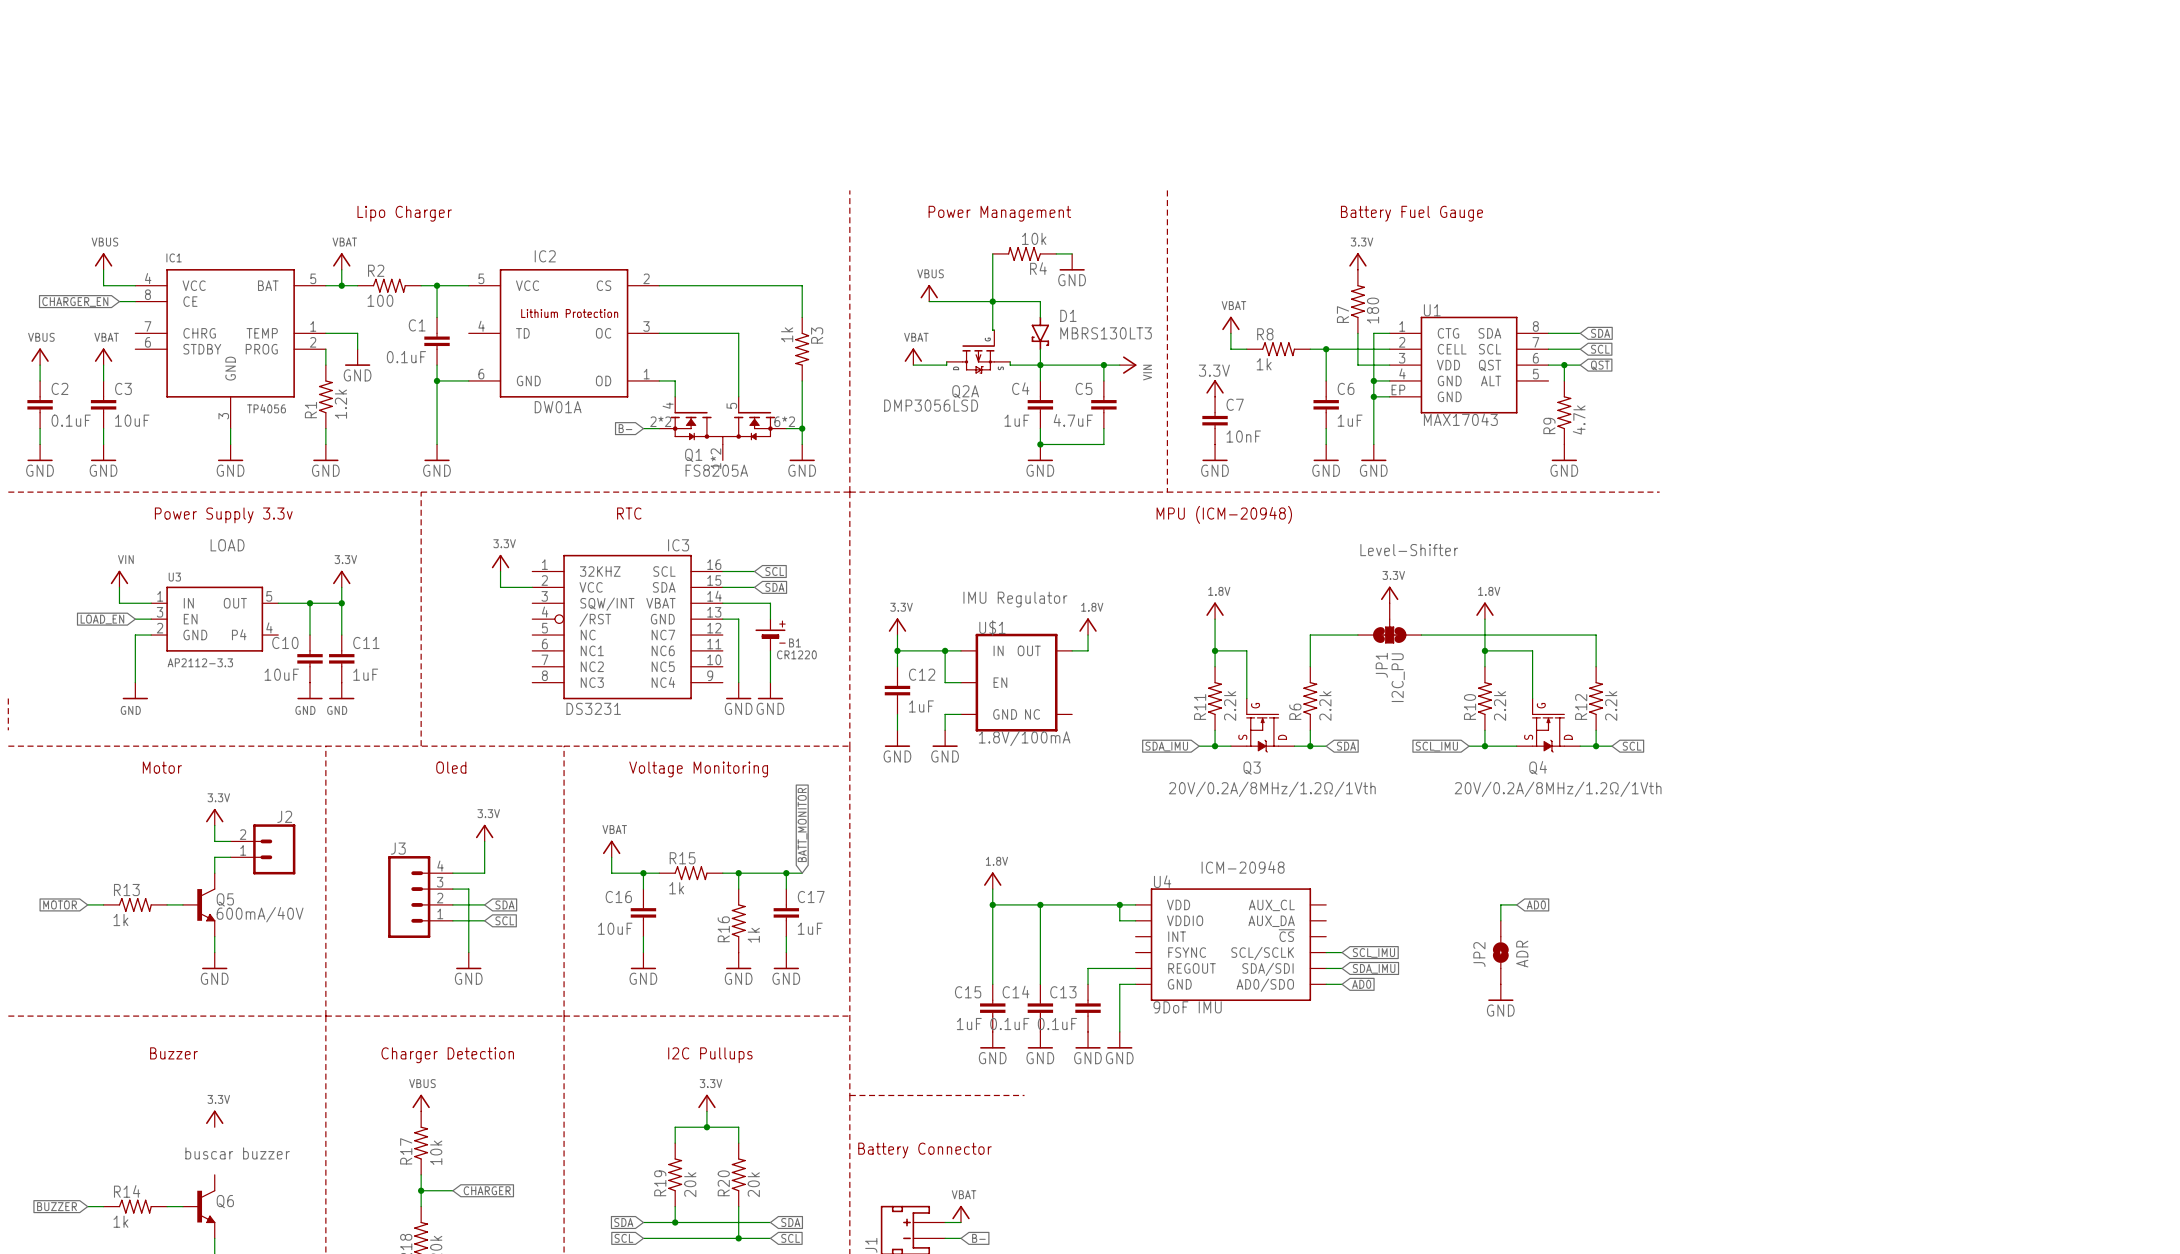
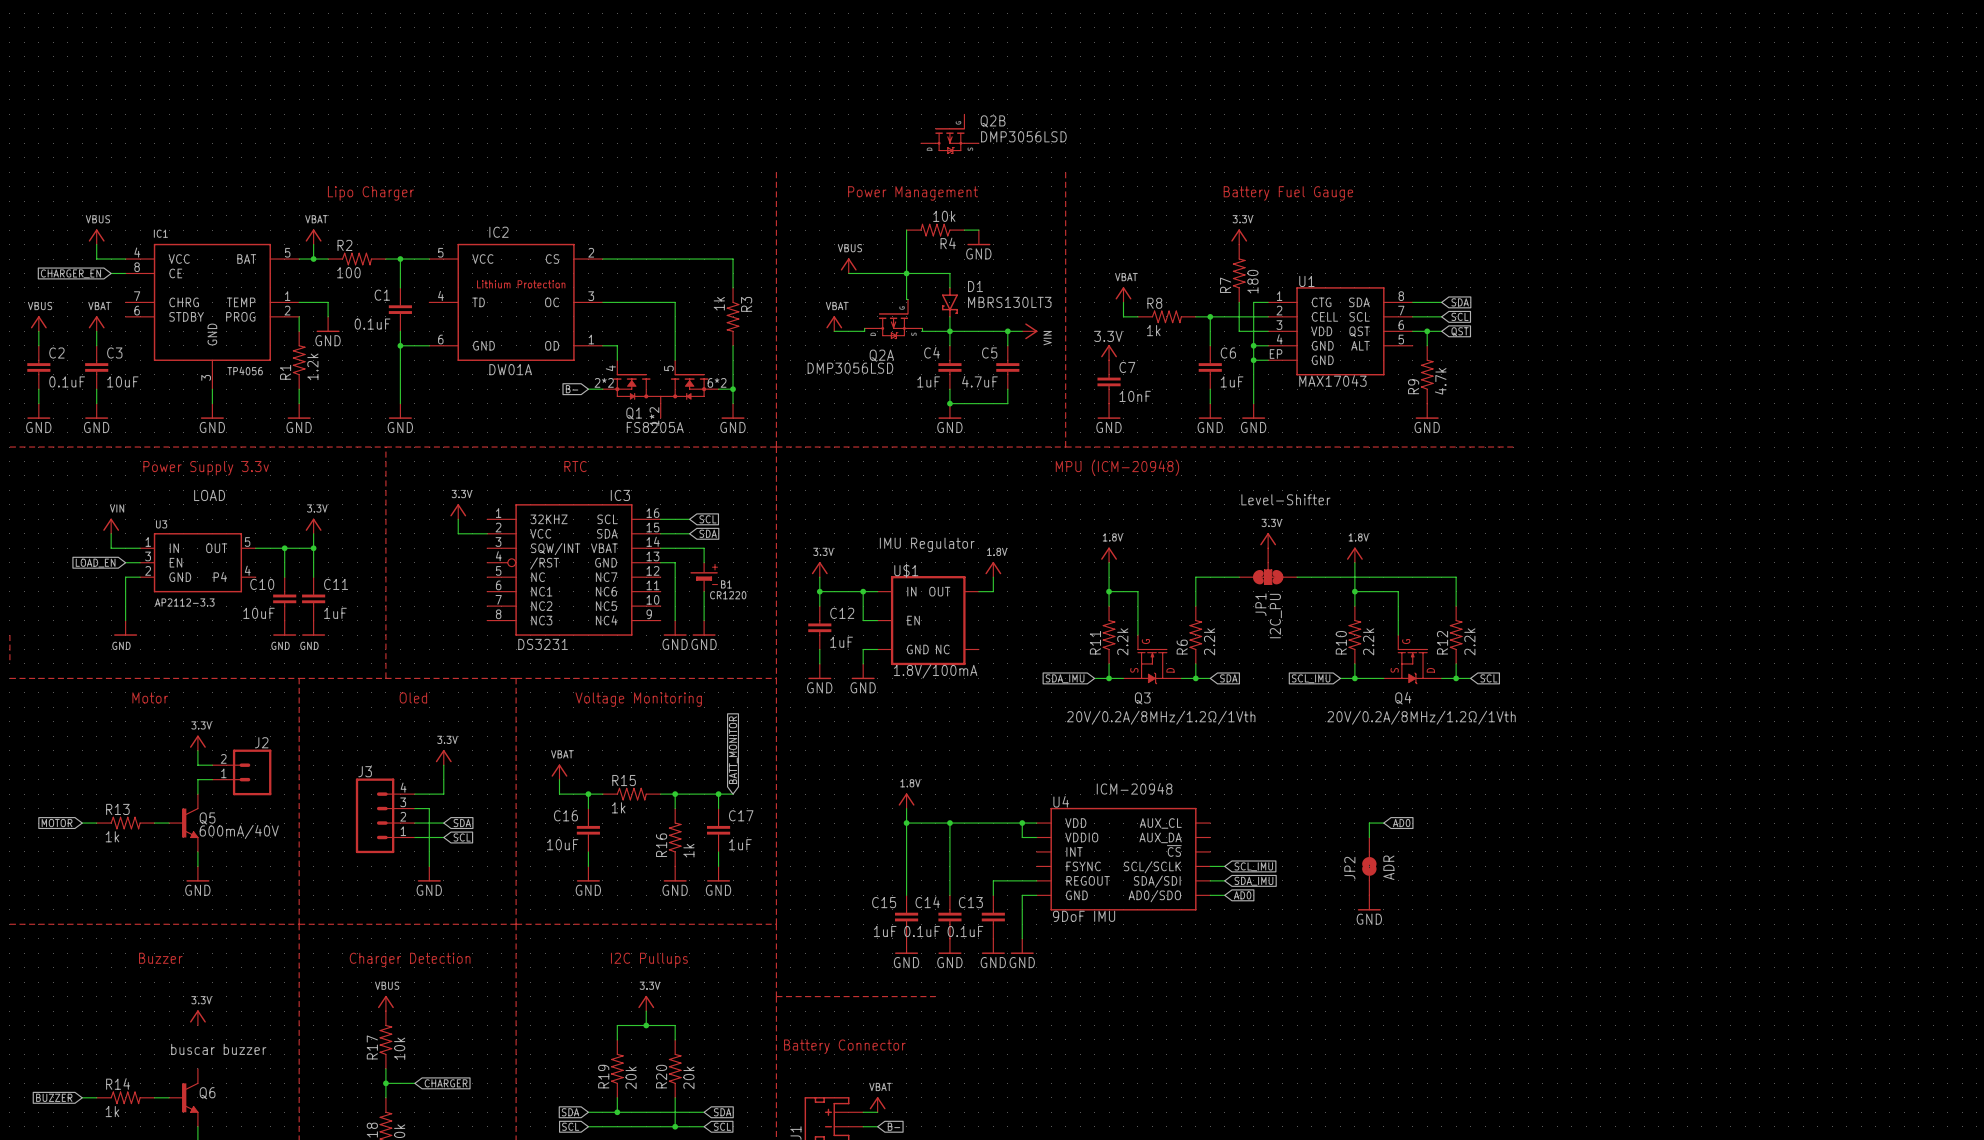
Q2B: none -> DMP3056LSD (949, 134)

